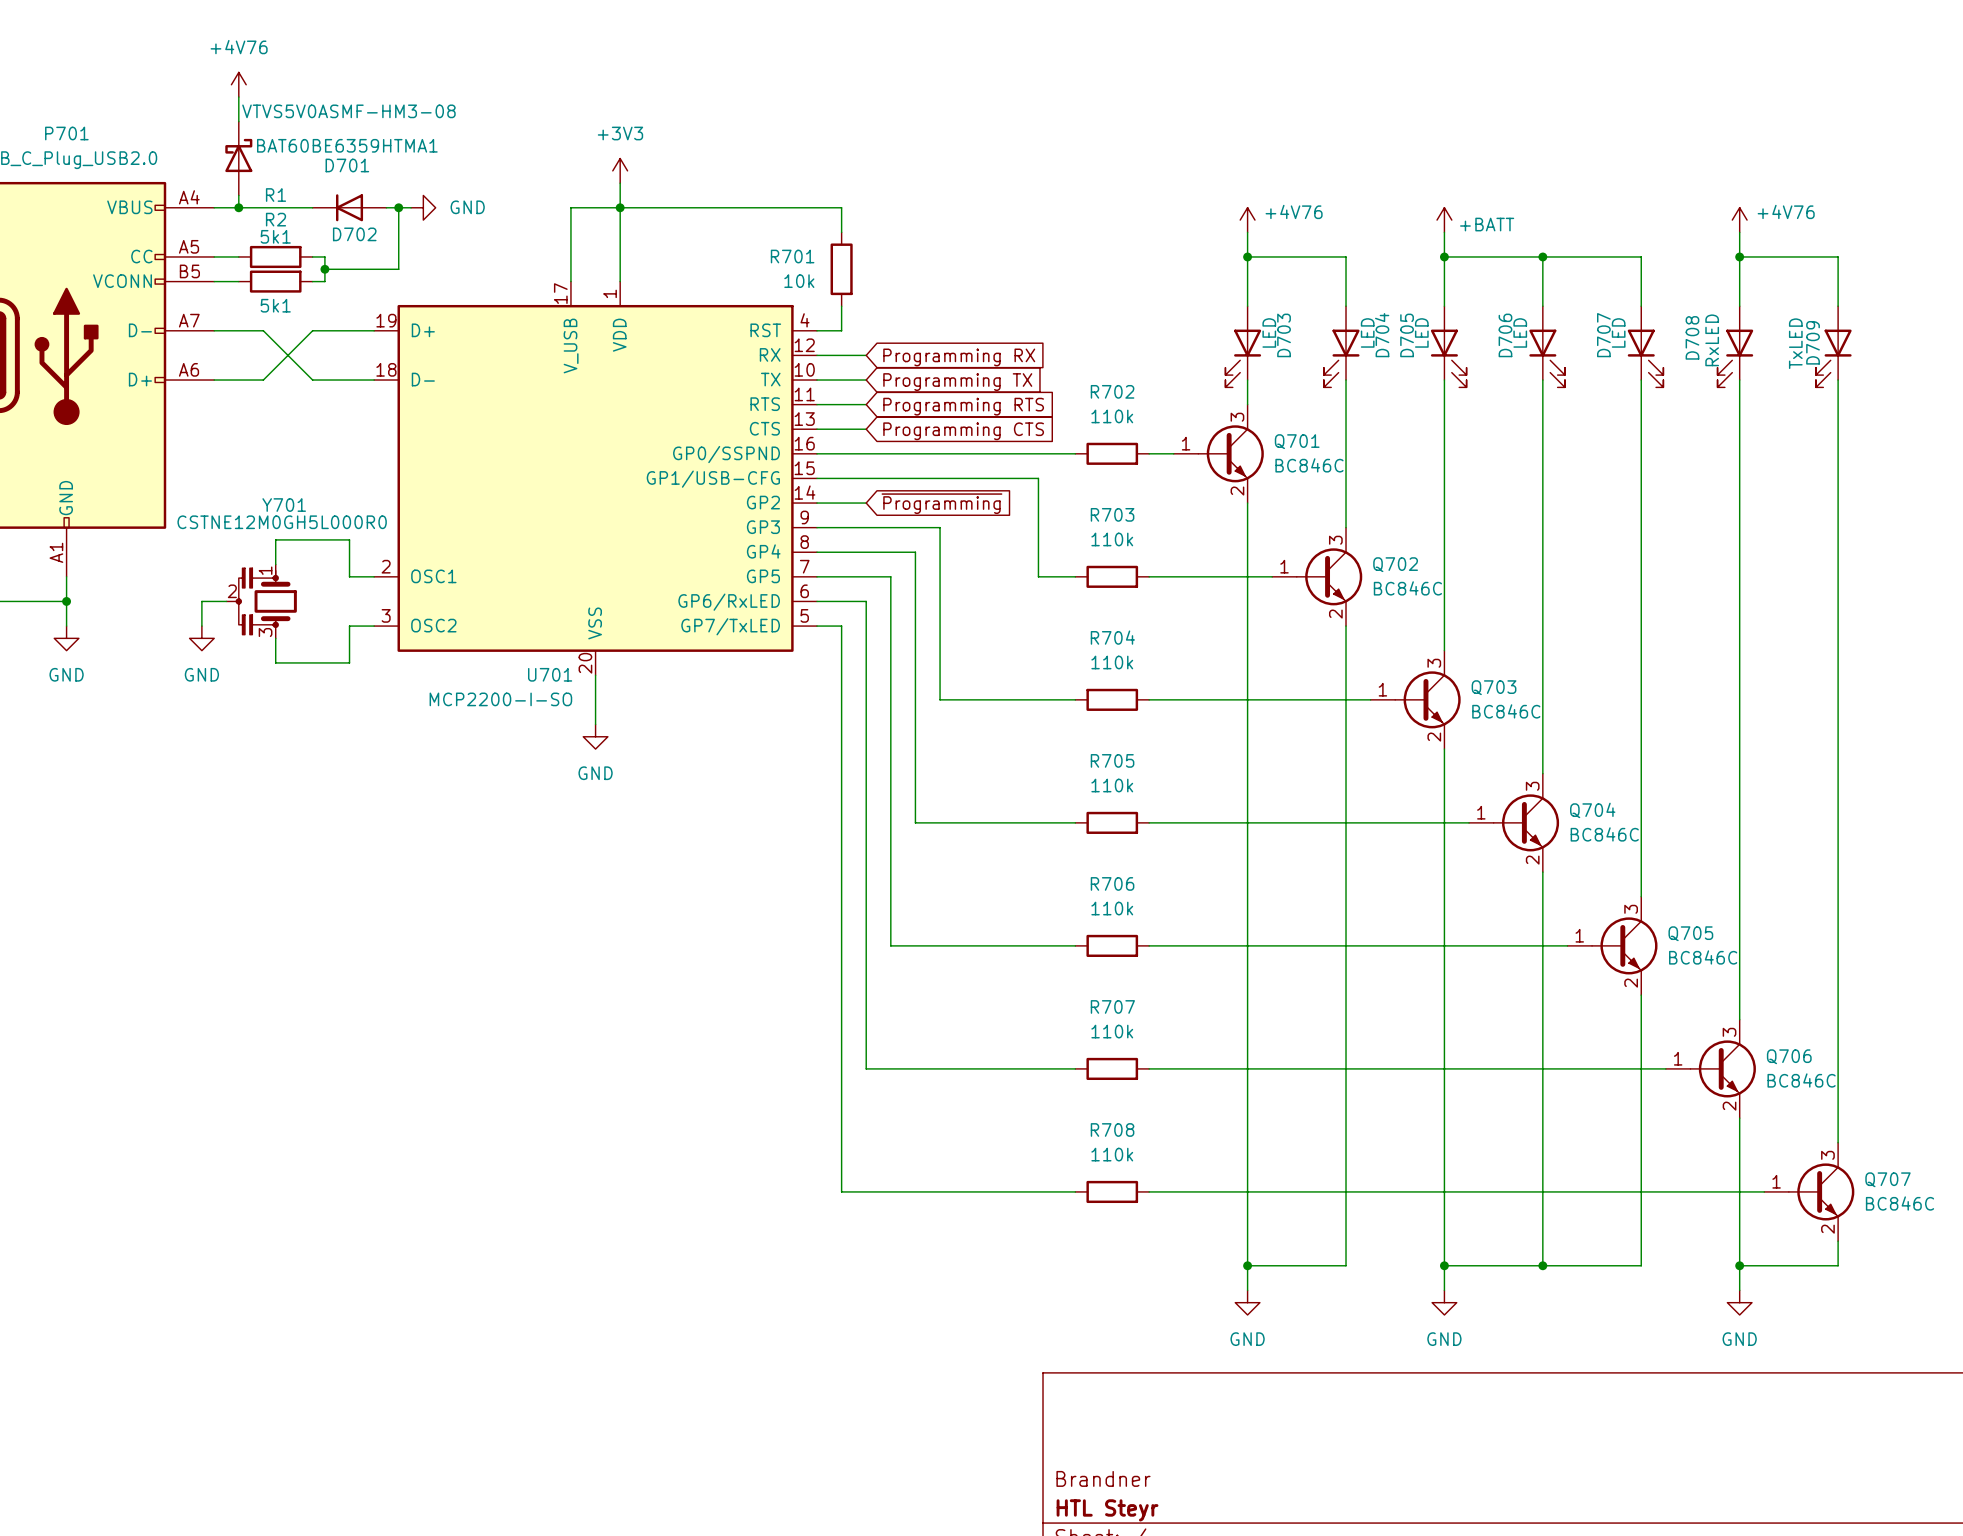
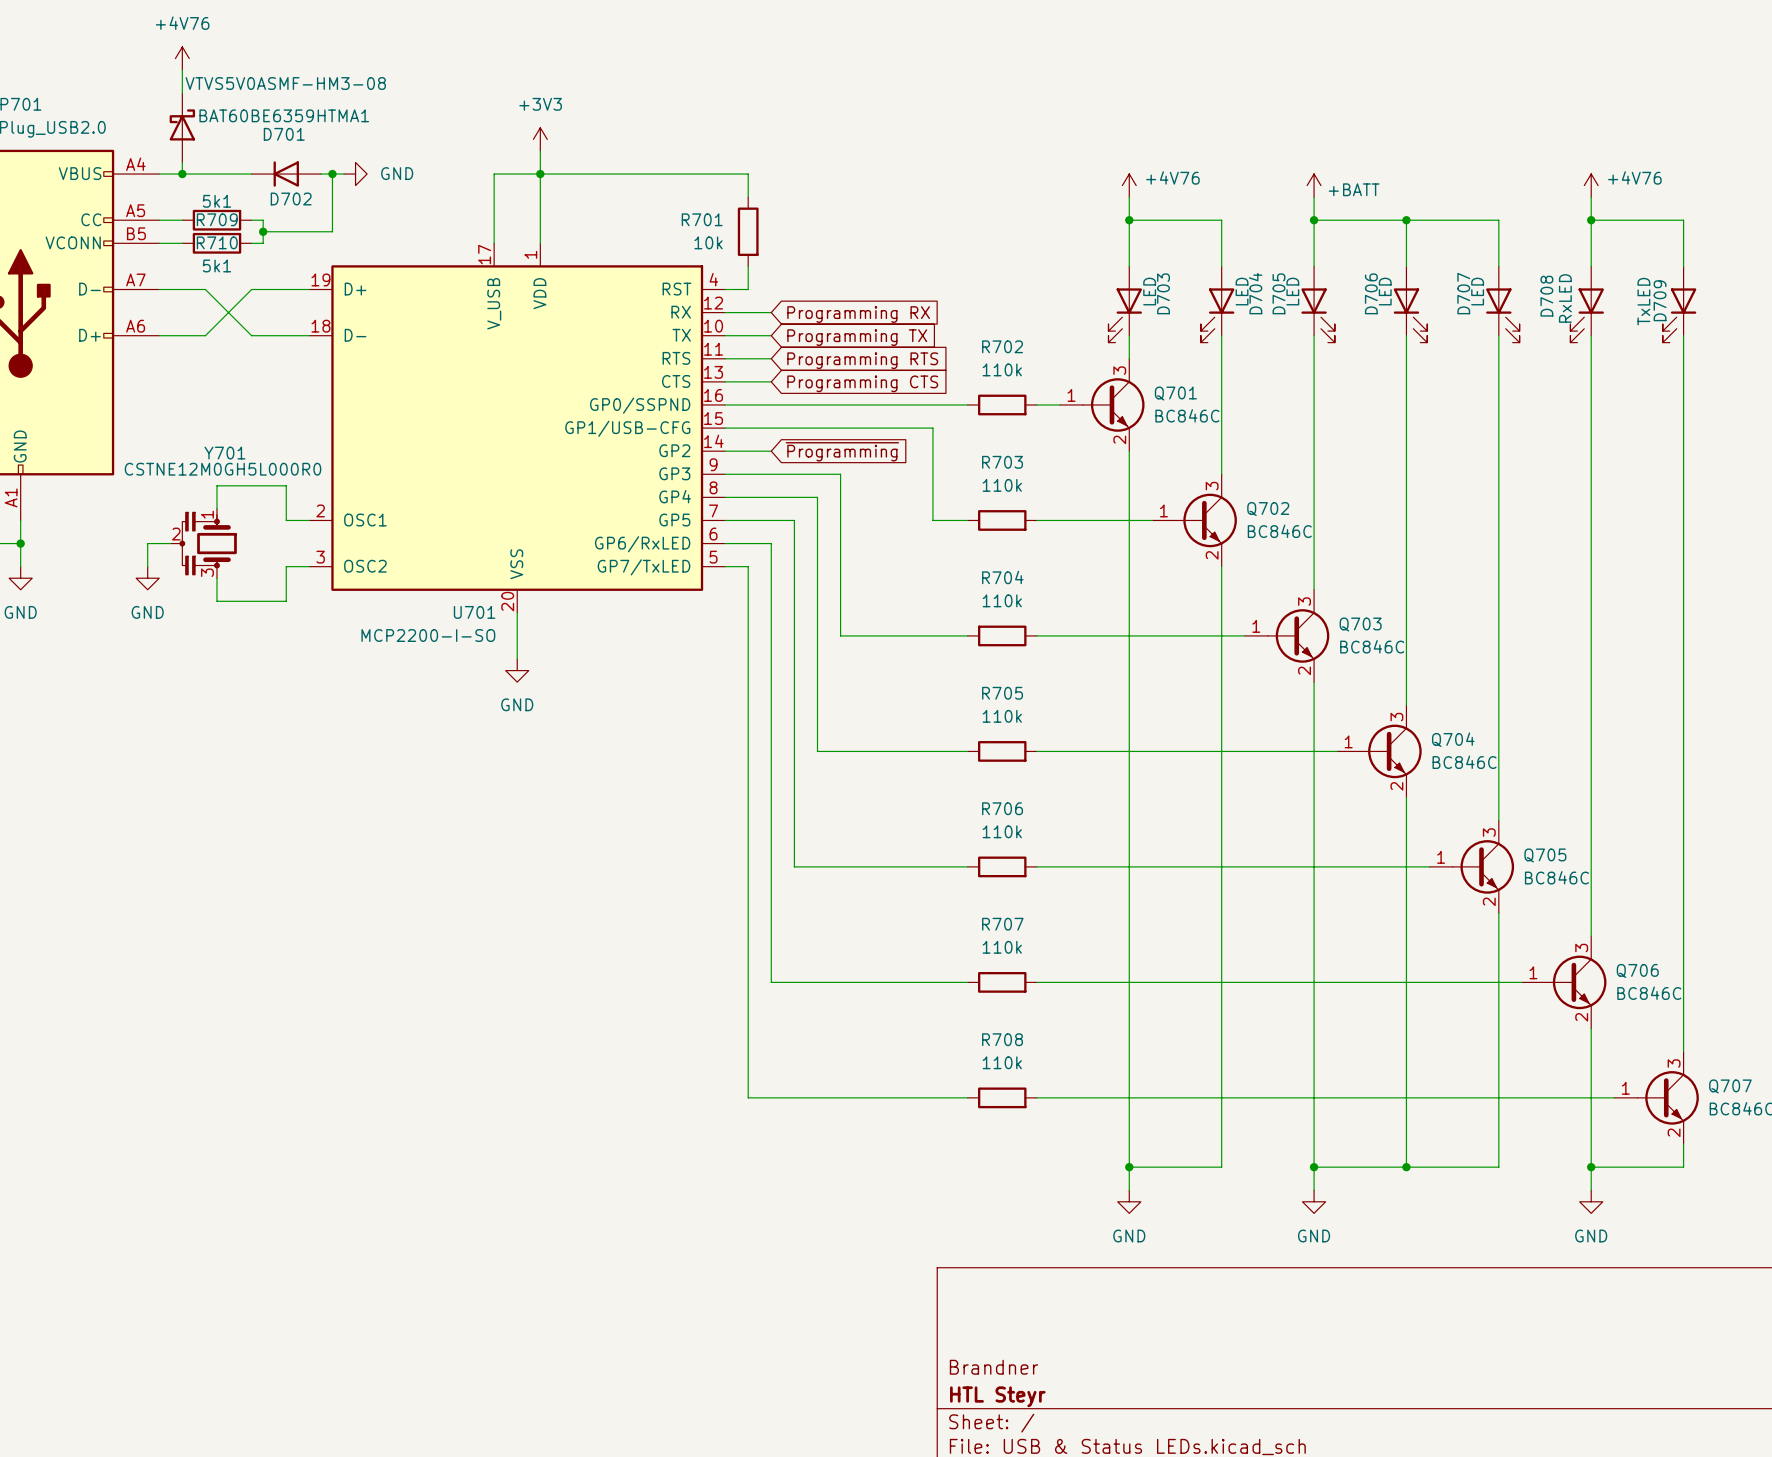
R1 name: R1 (276, 195) -> R709 (217, 219)
R2 name: R2 (276, 219) -> R710 (217, 242)

